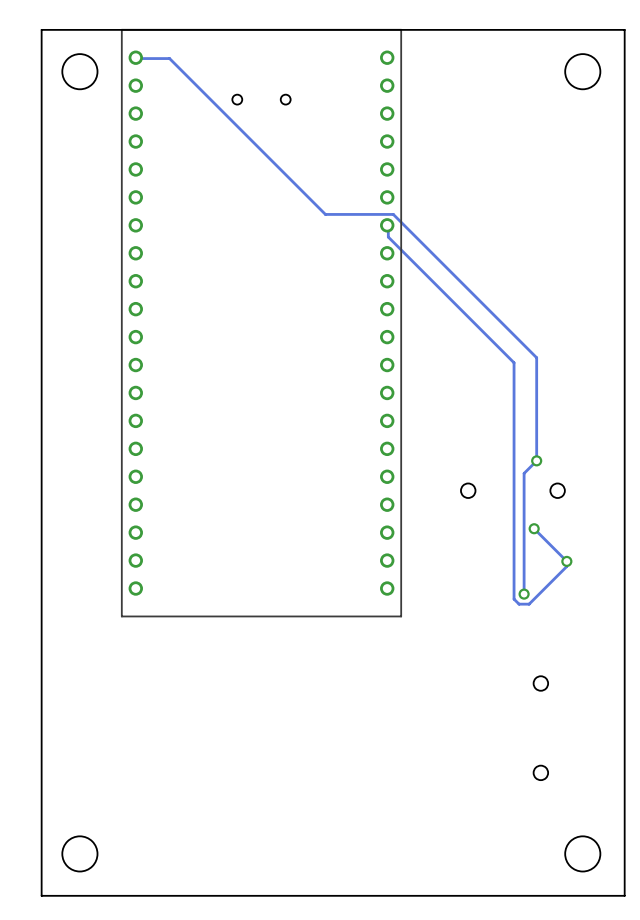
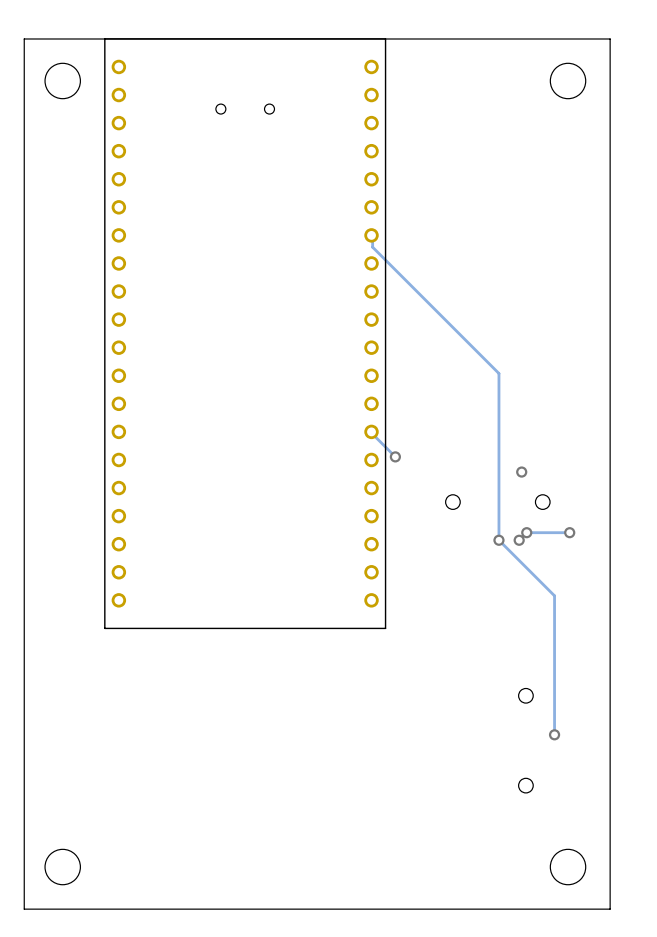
track: (135, 57) (169, 58) (325, 214) (393, 214) (536, 357) (536, 460) (524, 473) (524, 594) -> none
track: none -> (371, 431) (395, 456)
via: none -> (395, 456)
via: none -> (526, 532)
track: none -> (569, 532) (526, 532)
via: none -> (569, 532)
via: none -> (498, 540)
track: (534, 528) (566, 561) (566, 566) (529, 604) (519, 604) (514, 599) (514, 528) -> (554, 734) (554, 595) (498, 540)
via: (566, 561) -> none
via: (524, 594) -> none
via: none -> (554, 734)

